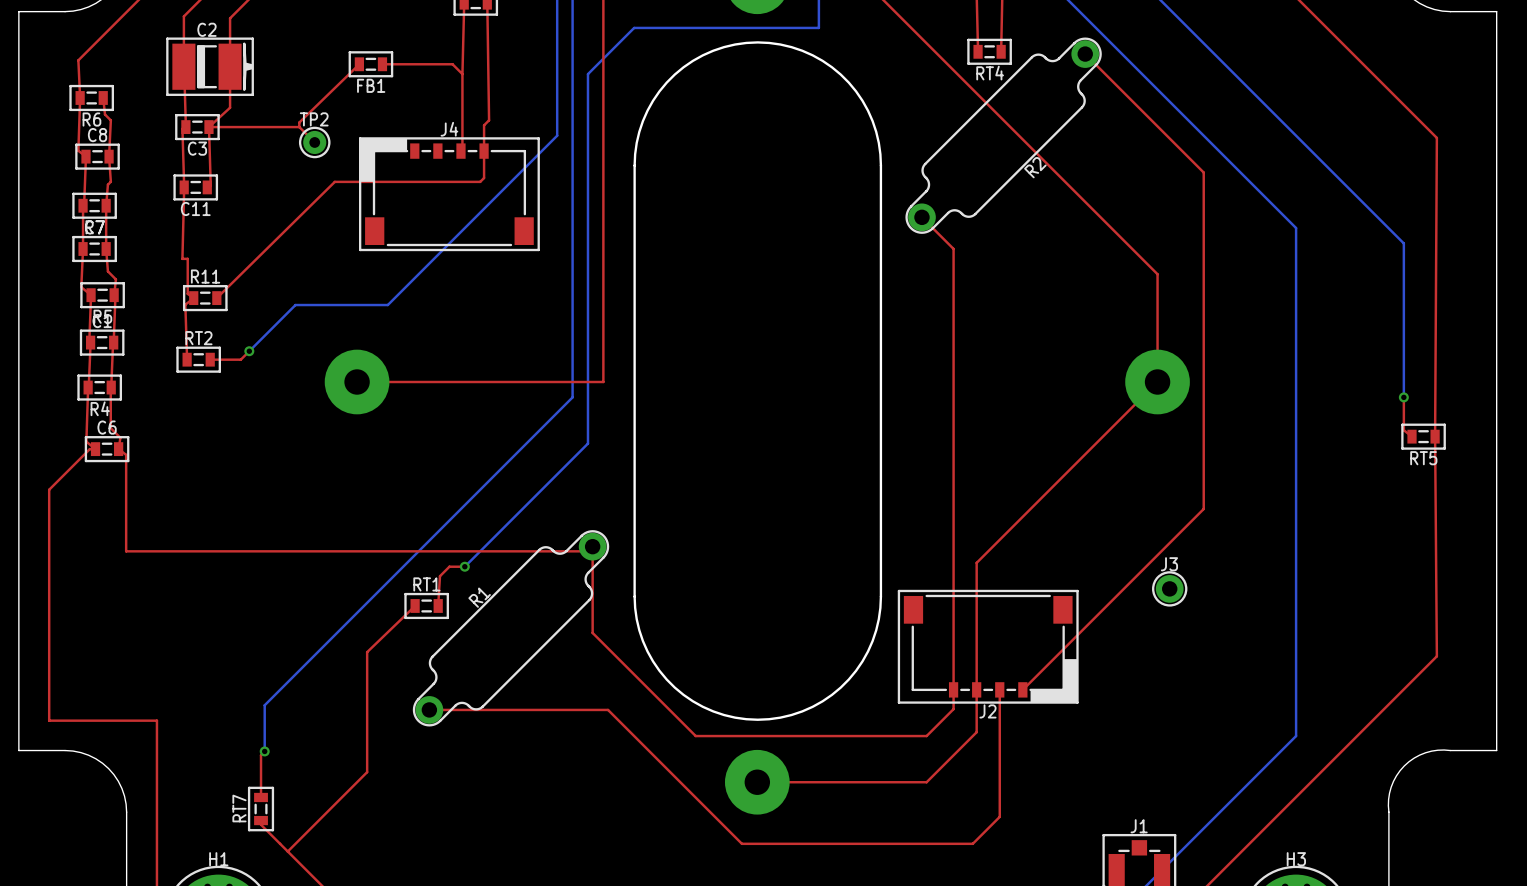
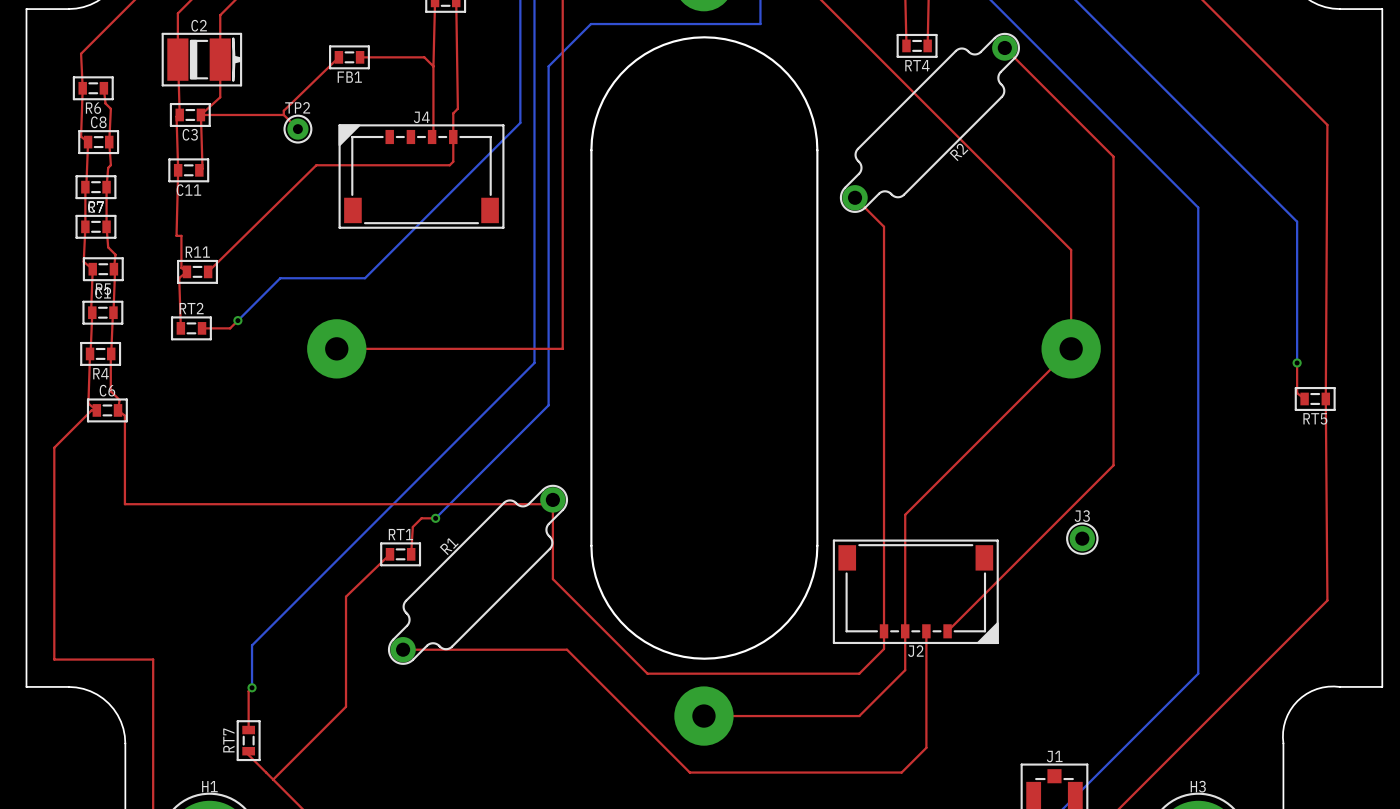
J4 footprint: [358, 137, 540, 252] -> [338, 124, 505, 229]
J2 footprint: [897, 589, 1079, 704] -> [832, 539, 999, 645]

